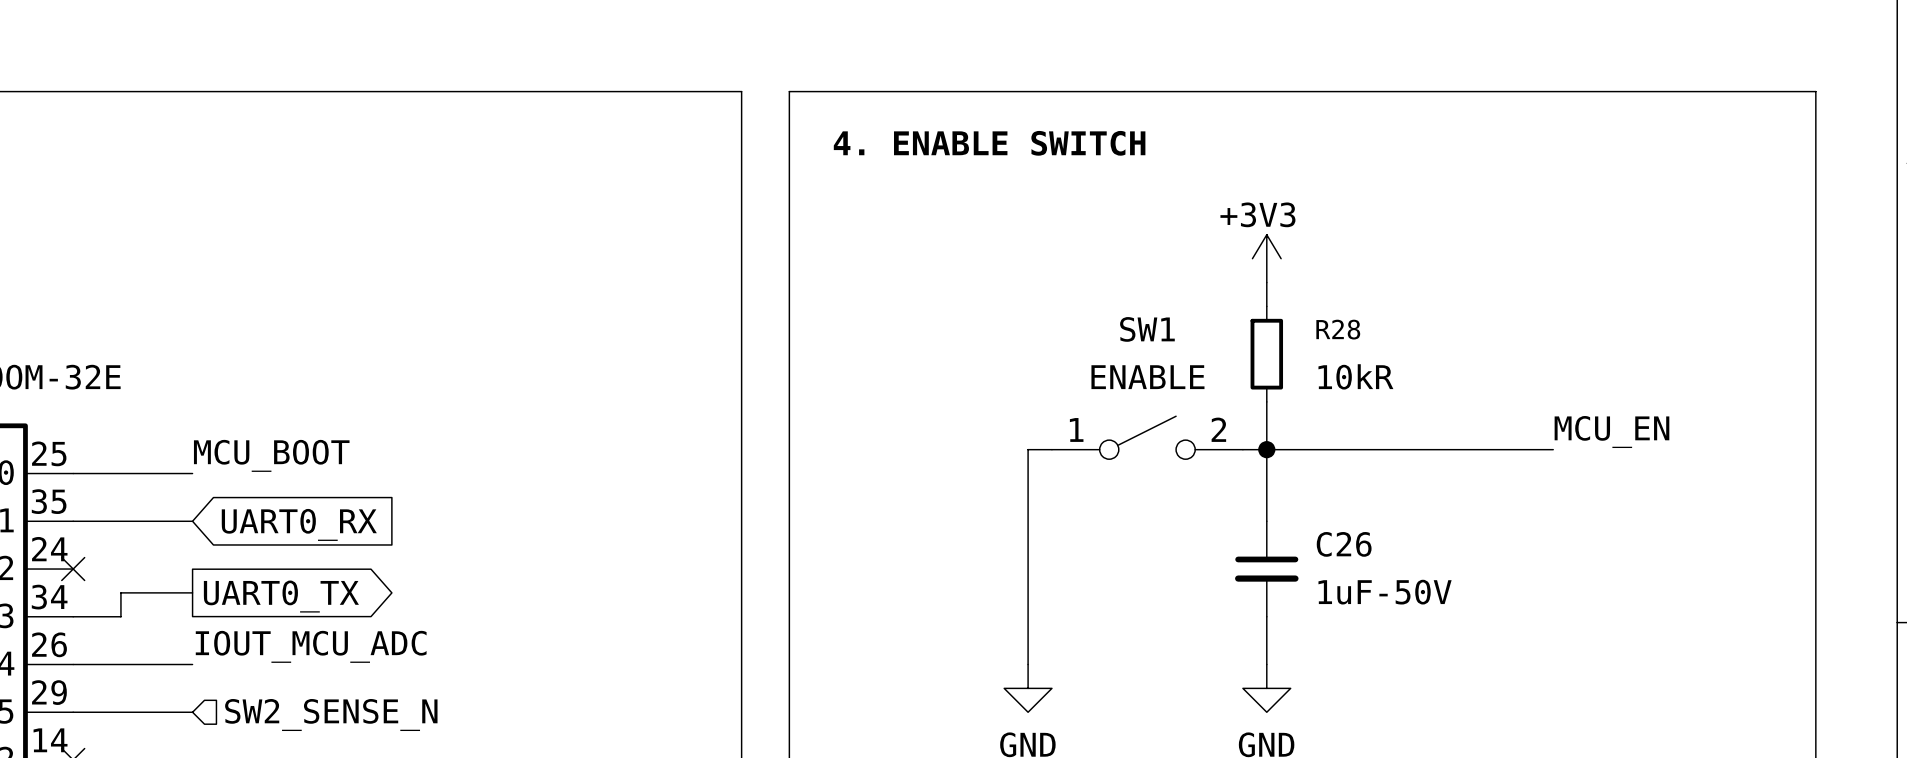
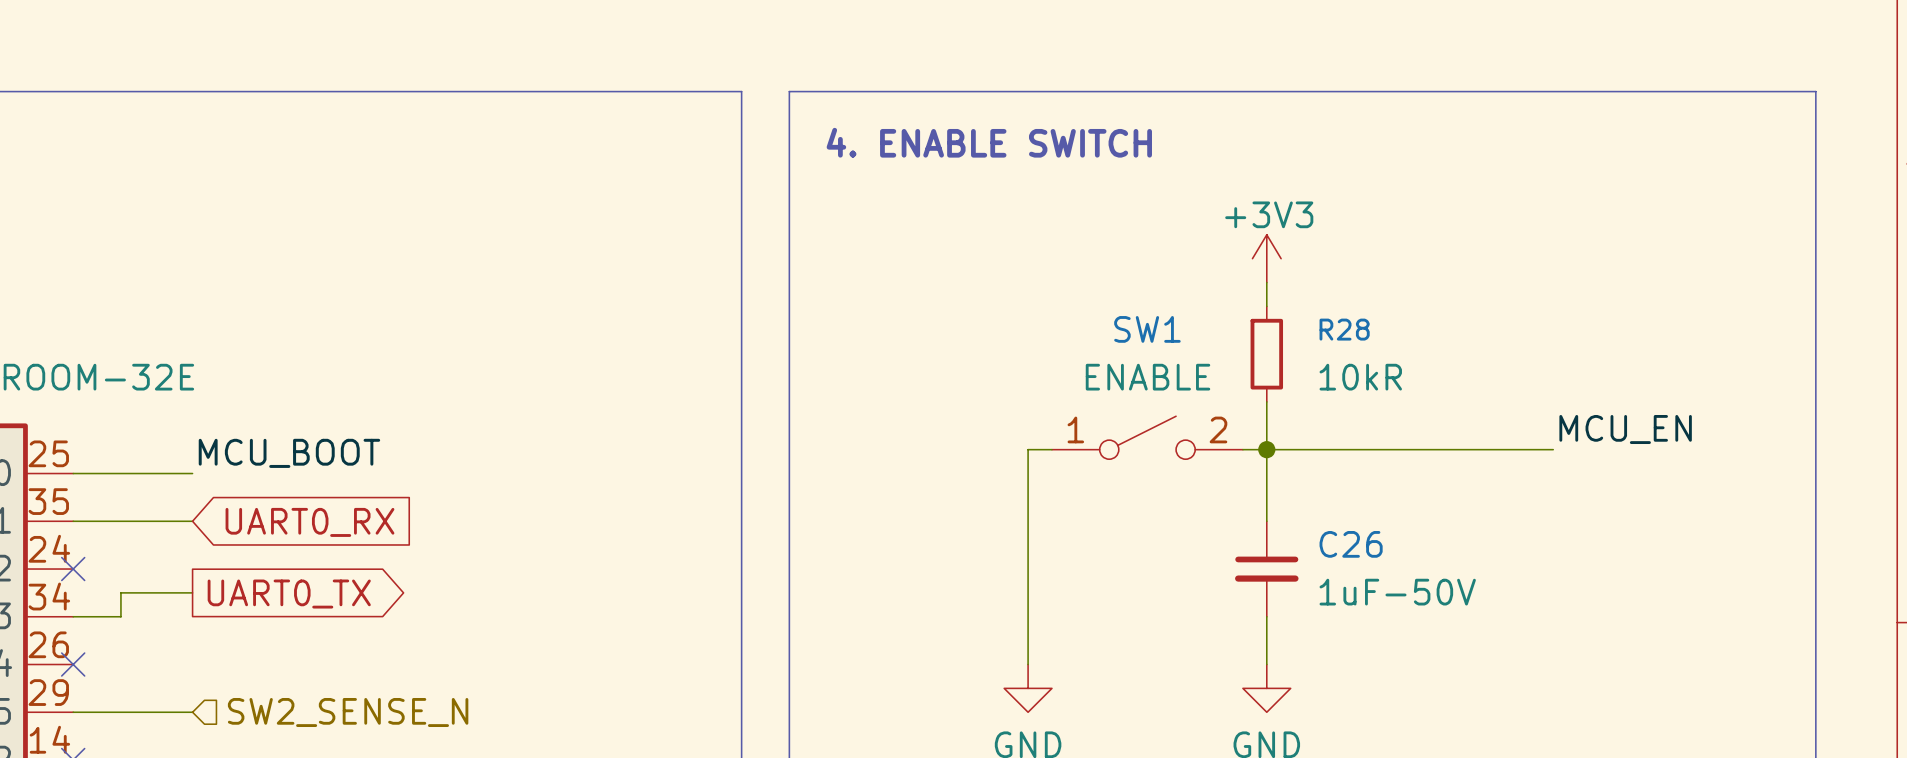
label: IOUT_MCU_ADC (311, 646) -> none
wire: (73, 664) (192, 664) -> none
no-connect mark: none -> (73, 664)

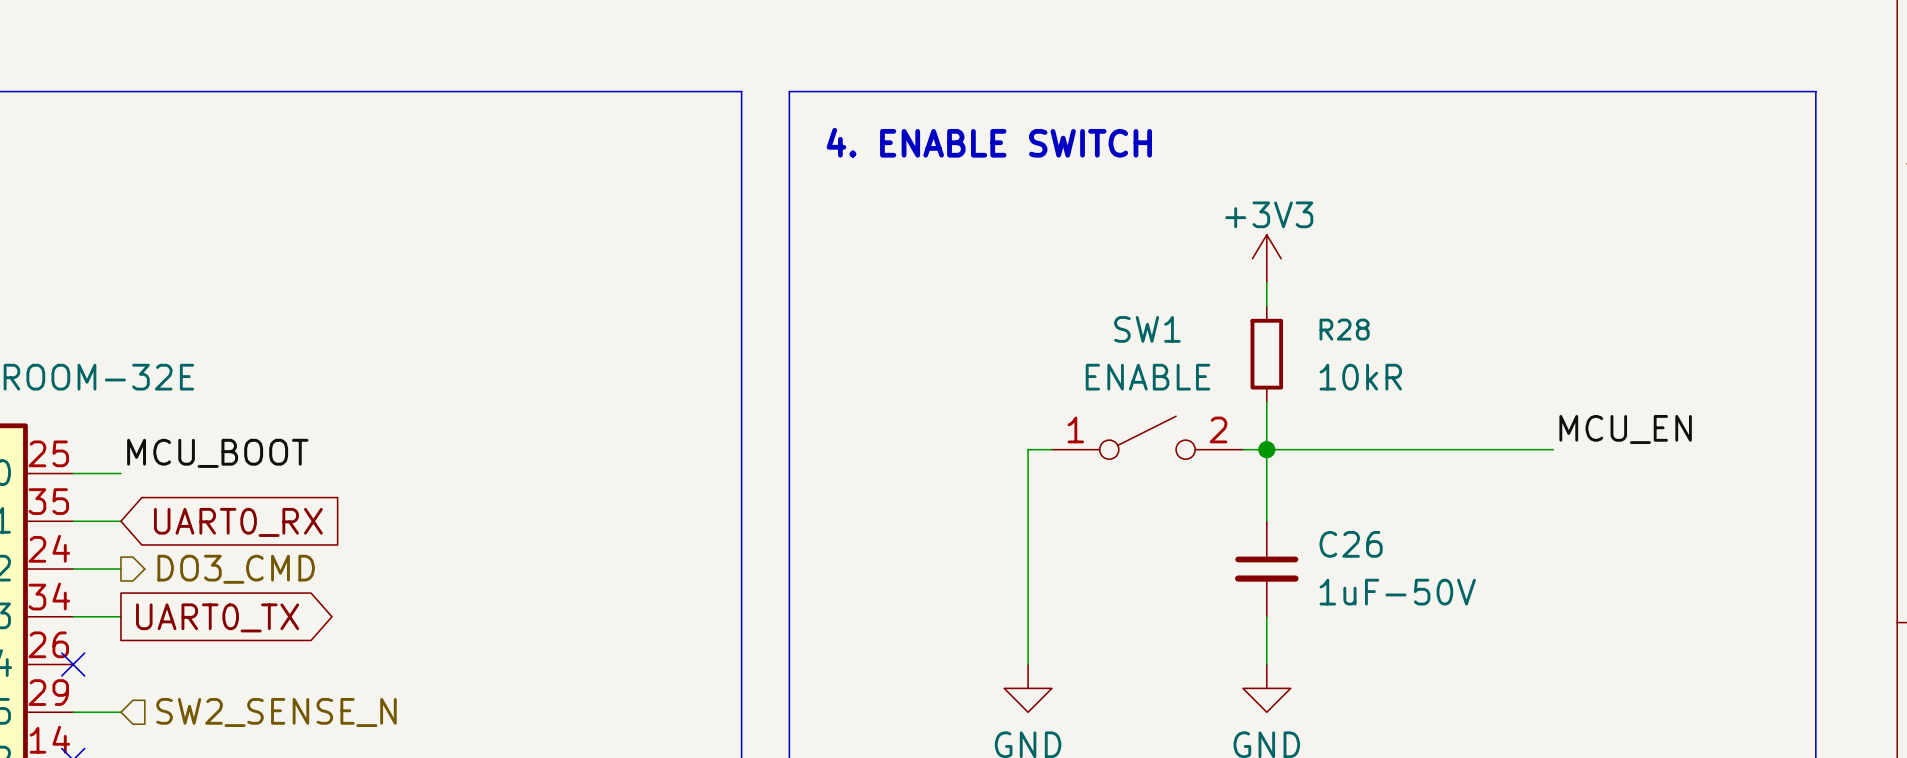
label position: MCU_BOOT (289, 453) -> MCU_BOOT (217, 453)
wire: (120, 473) (192, 473) -> none
wire: (120, 521) (192, 521) -> none
global label position: UART0_RX (309, 522) -> UART0_RX (238, 522)
wire: none -> (73, 569) (120, 569)
no-connect mark: (73, 569) -> none
hierarchical label: none -> DO3_CMD (236, 569)
global label position: UART0_TX (289, 594) -> UART0_TX (217, 617)
wire: (120, 712) (192, 712) -> none
hierarchical label position: SW2_SENSE_N (348, 712) -> SW2_SENSE_N (276, 712)

